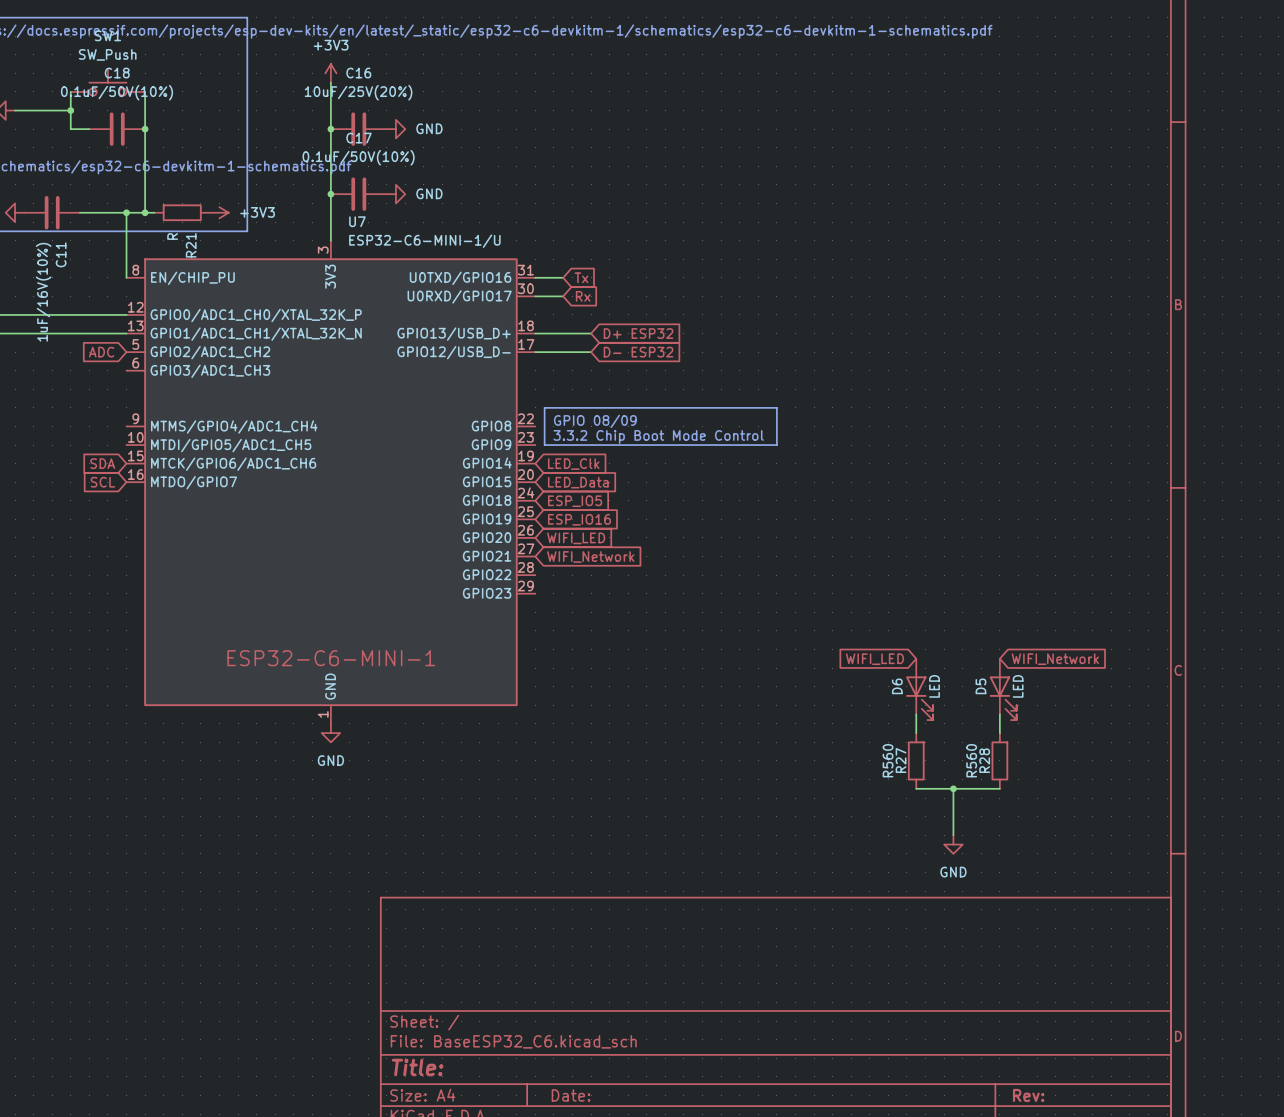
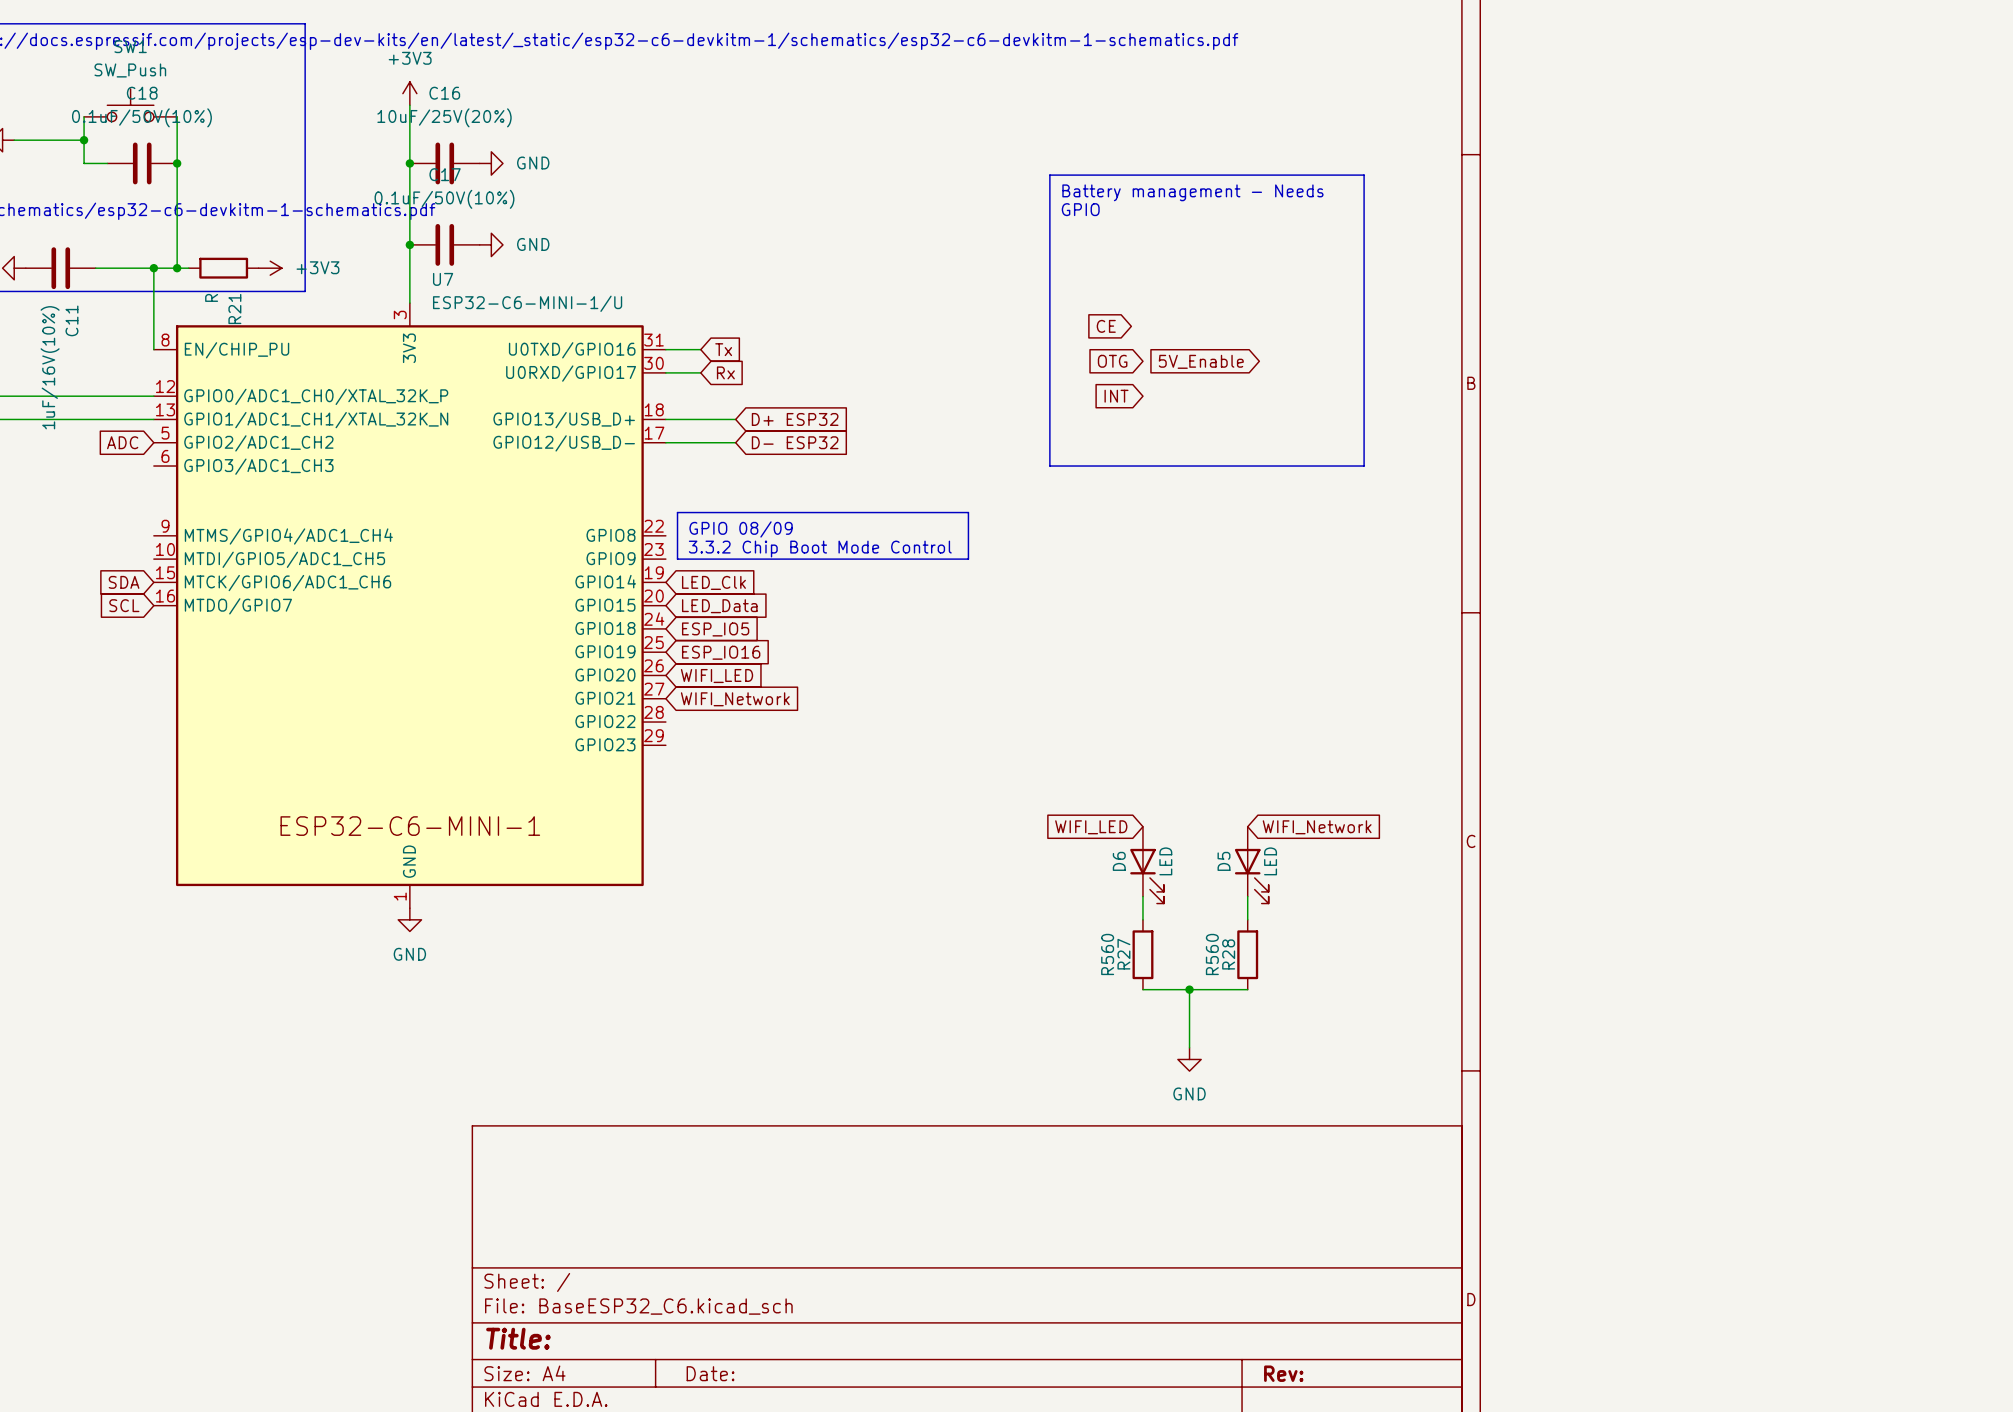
line: none -> (1049, 175) (1364, 175) (1364, 466) (1049, 466) (1049, 175)
text: none -> Battery management - Needs (1192, 192)
text: none -> GPIO (1080, 209)
global label: none -> CE (1106, 326)
global label: none -> OTG (1112, 361)
global label: none -> 5V_Enable (1201, 361)
global label: none -> INT (1116, 396)

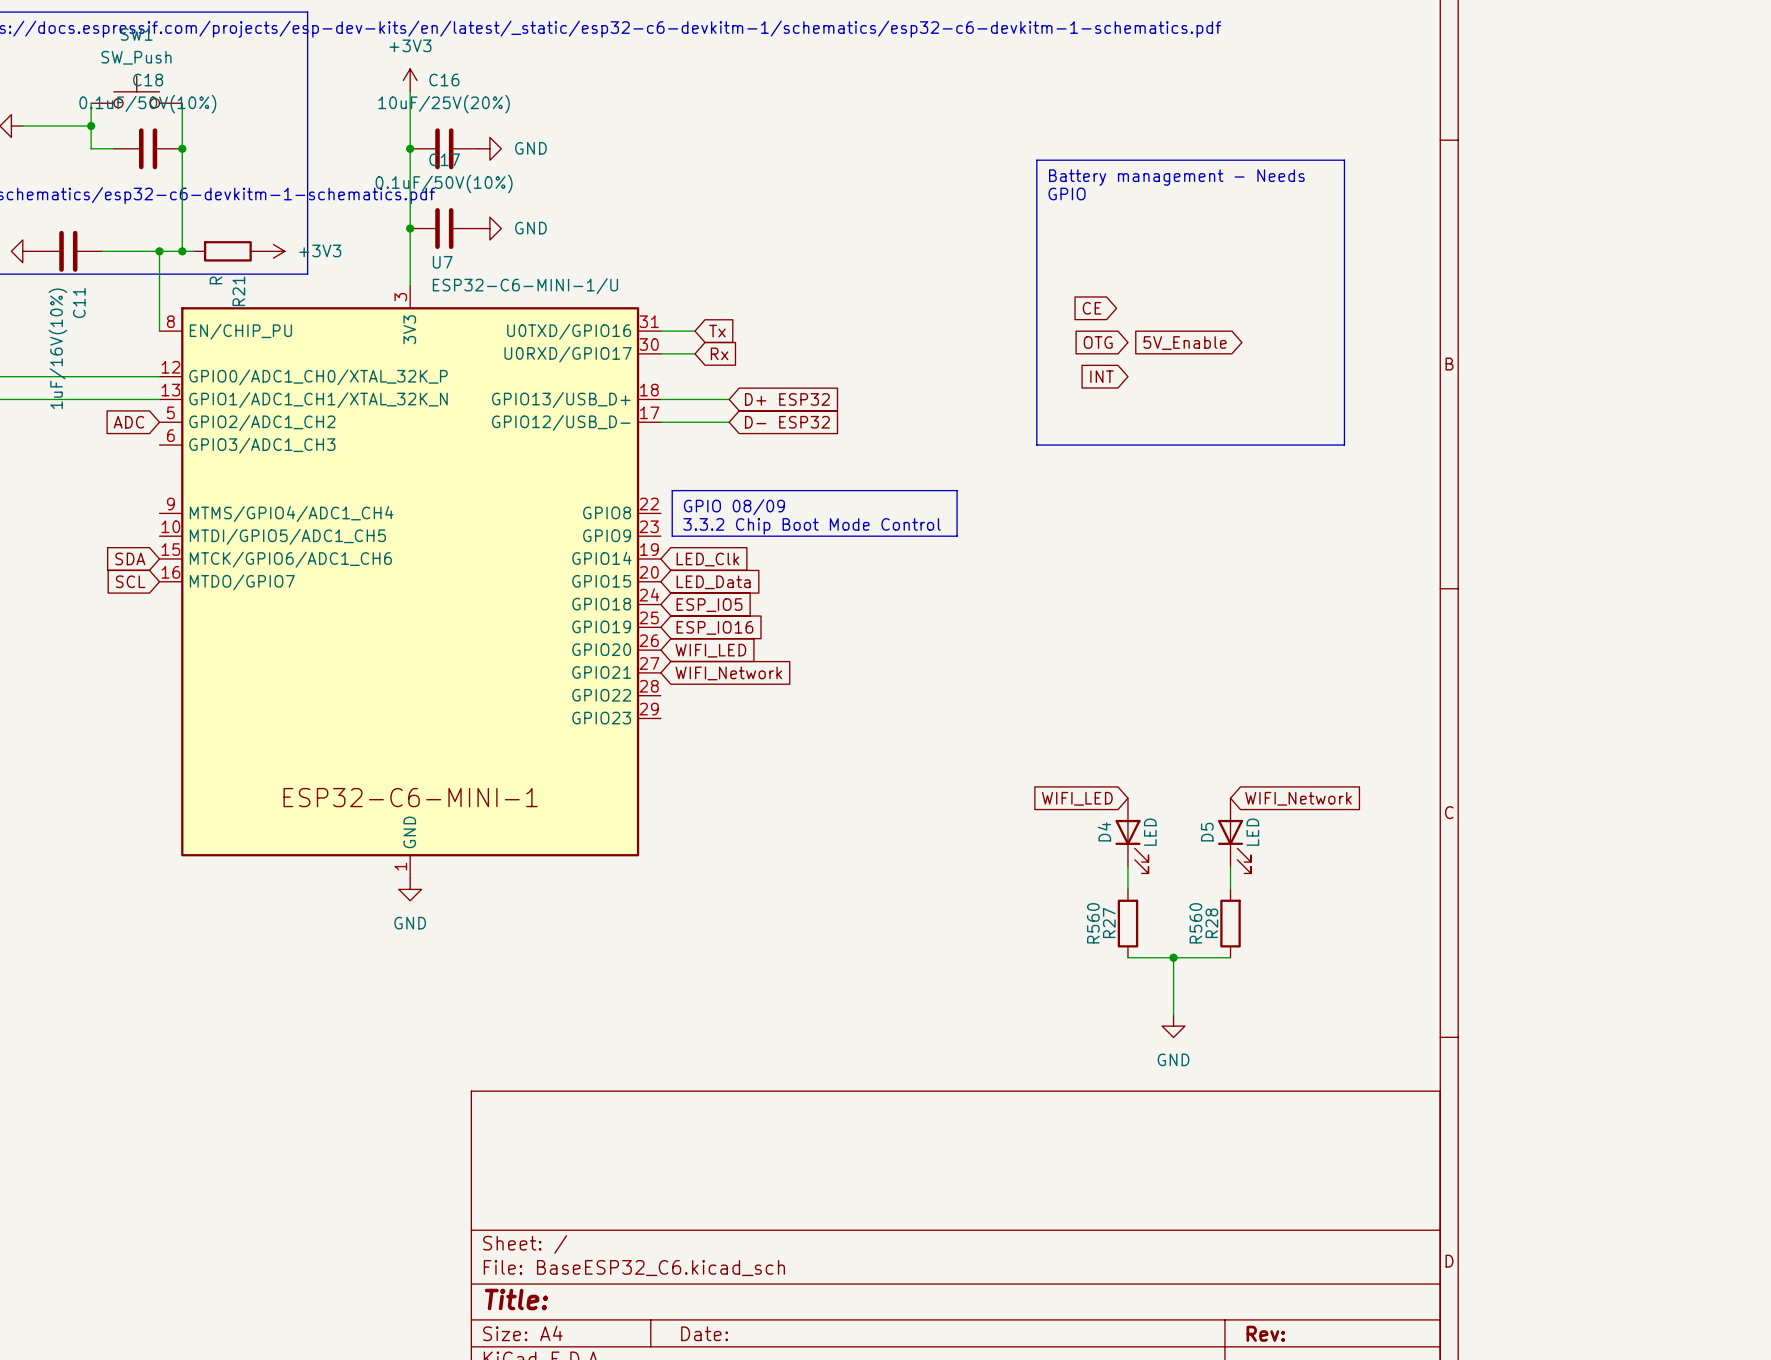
D6 name: D6 (1119, 861) -> D4 (1104, 831)

